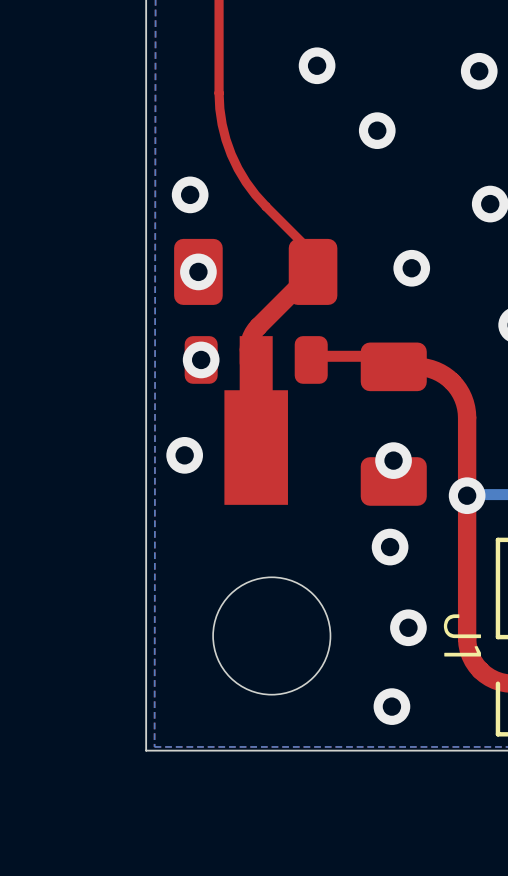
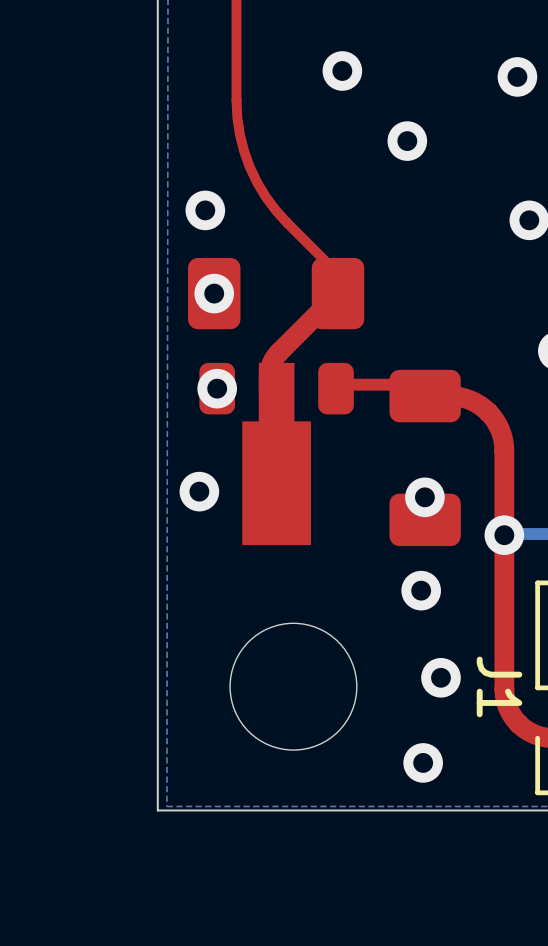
via: (411, 268) -> none

